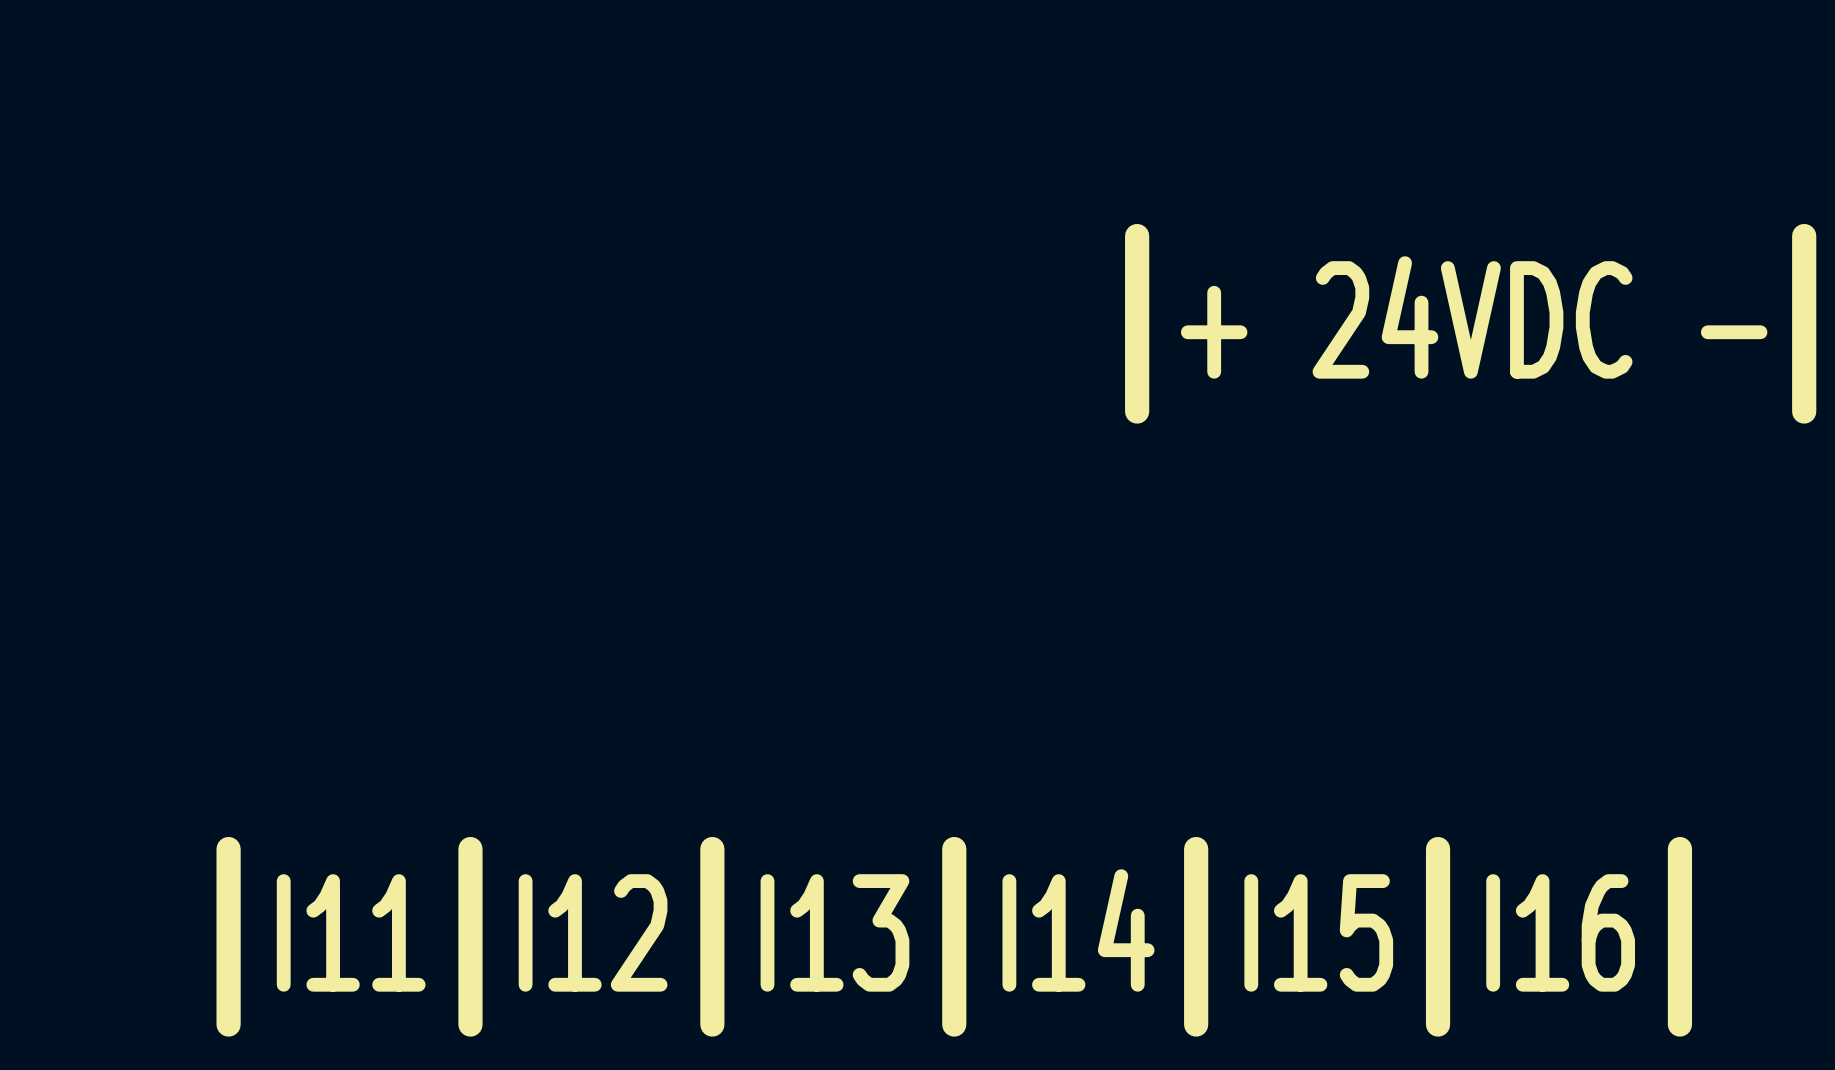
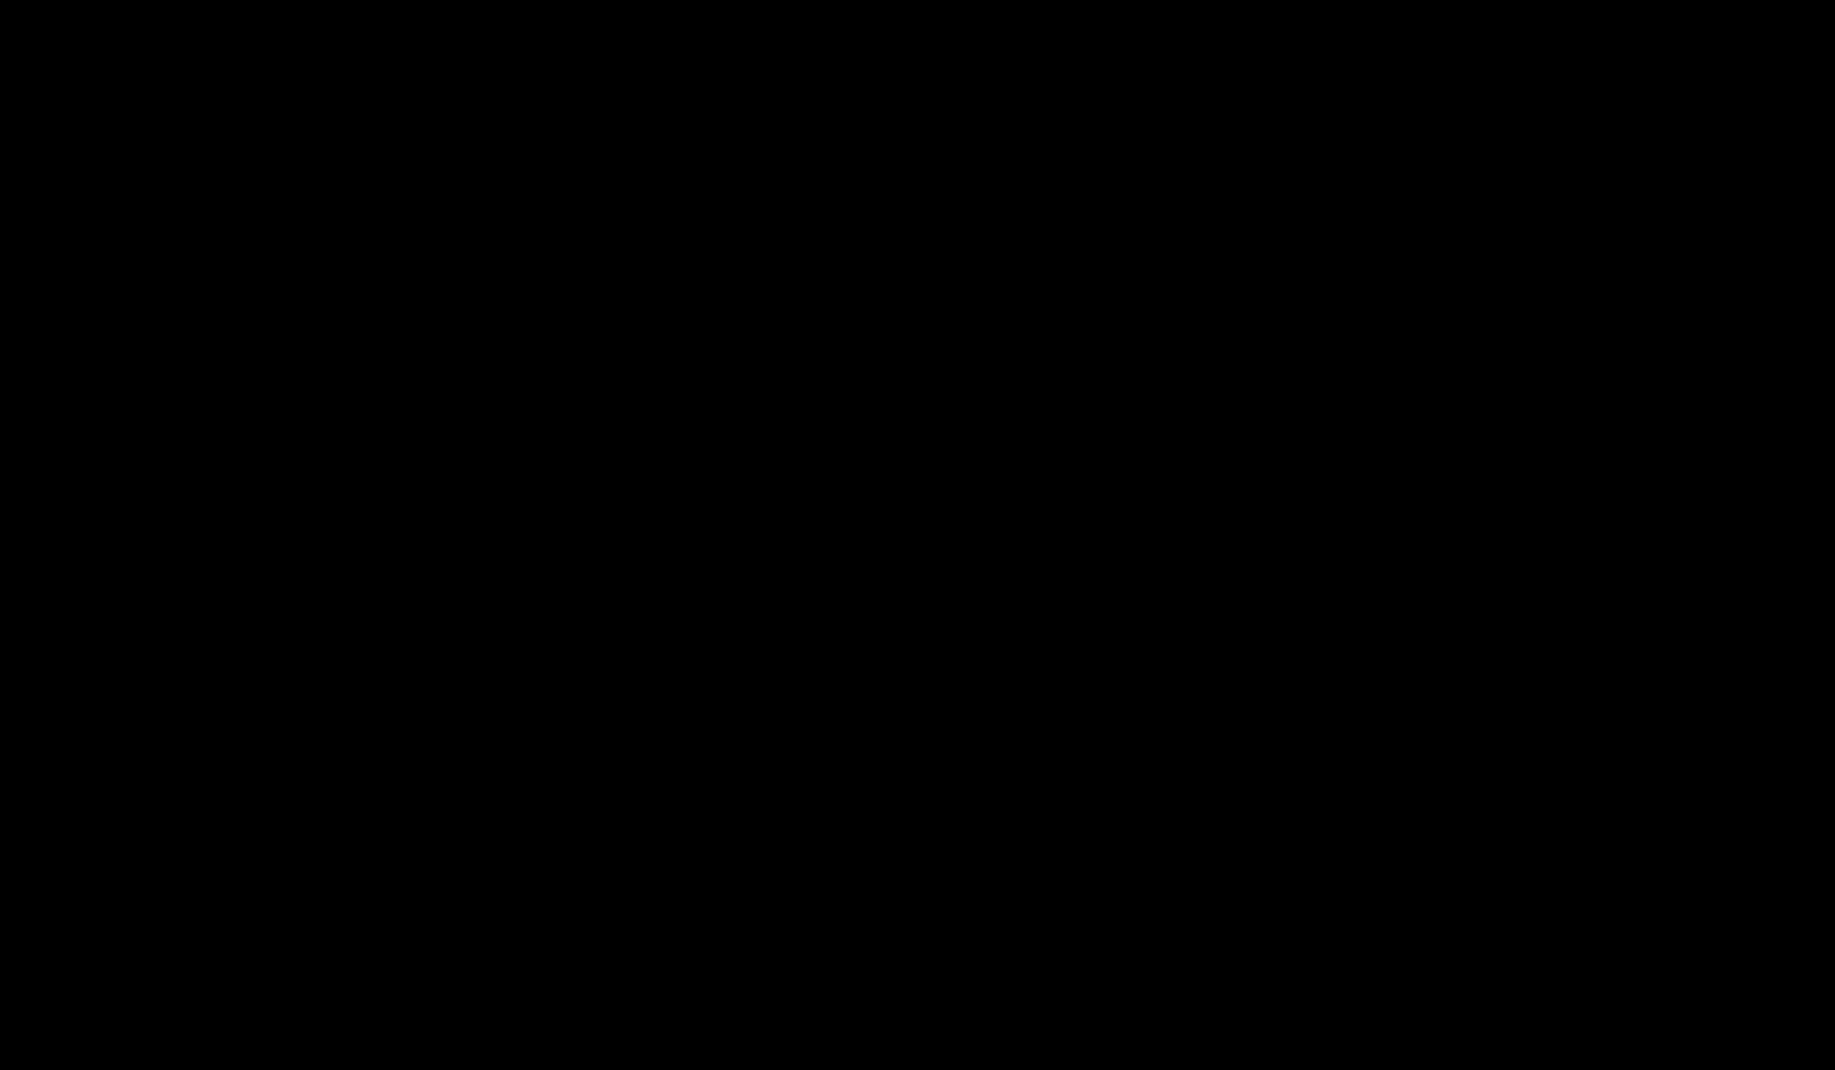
line: (1137, 236) (1137, 411) -> none
line: (1804, 236) (1804, 411) -> none
text: + 24VDC - (1474, 317) -> none
line: (228, 849) (228, 1024) -> none
line: (470, 849) (470, 1024) -> none
line: (712, 849) (712, 1024) -> none
line: (954, 849) (954, 1024) -> none
line: (1196, 849) (1196, 1024) -> none
line: (1438, 849) (1438, 1024) -> none
line: (1679, 849) (1679, 1024) -> none
text: I14 (1078, 930) -> none
text: I11 (351, 932) -> none
text: I12 (593, 932) -> none
text: I13 (834, 932) -> none
text: I15 (1318, 932) -> none
text: I16 (1560, 932) -> none

